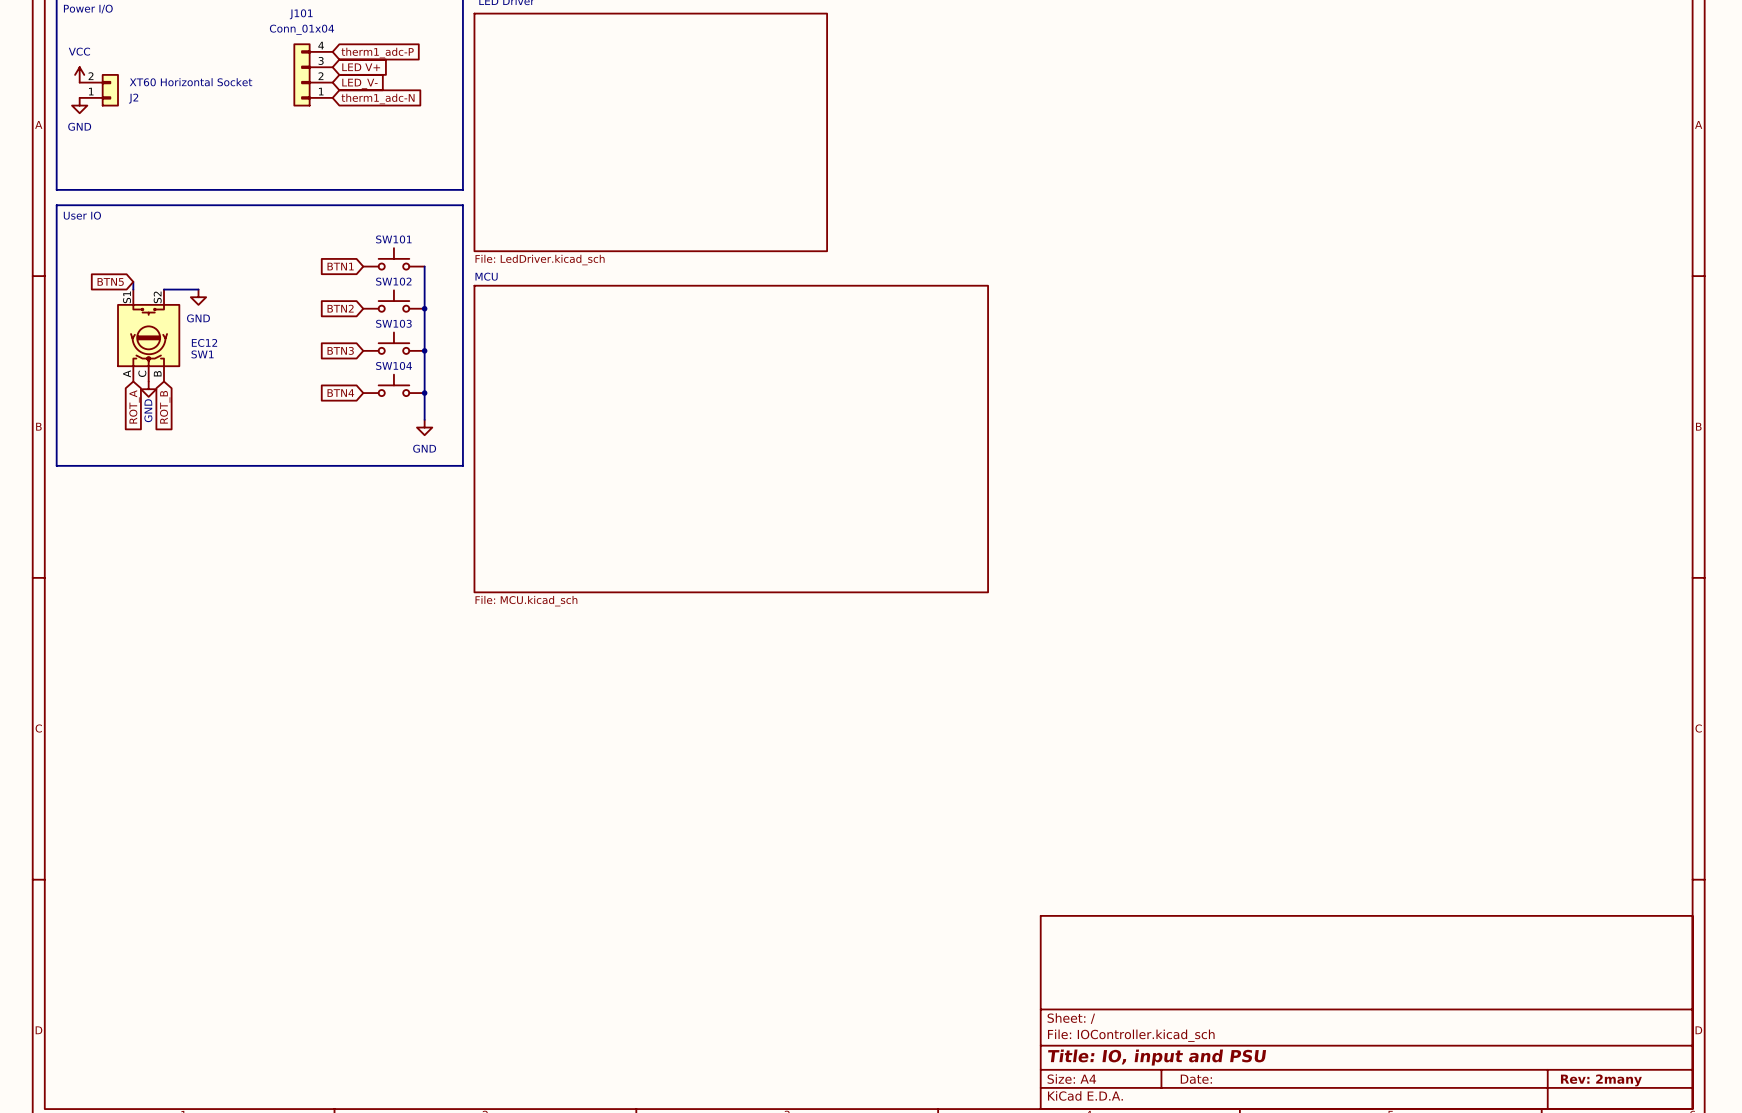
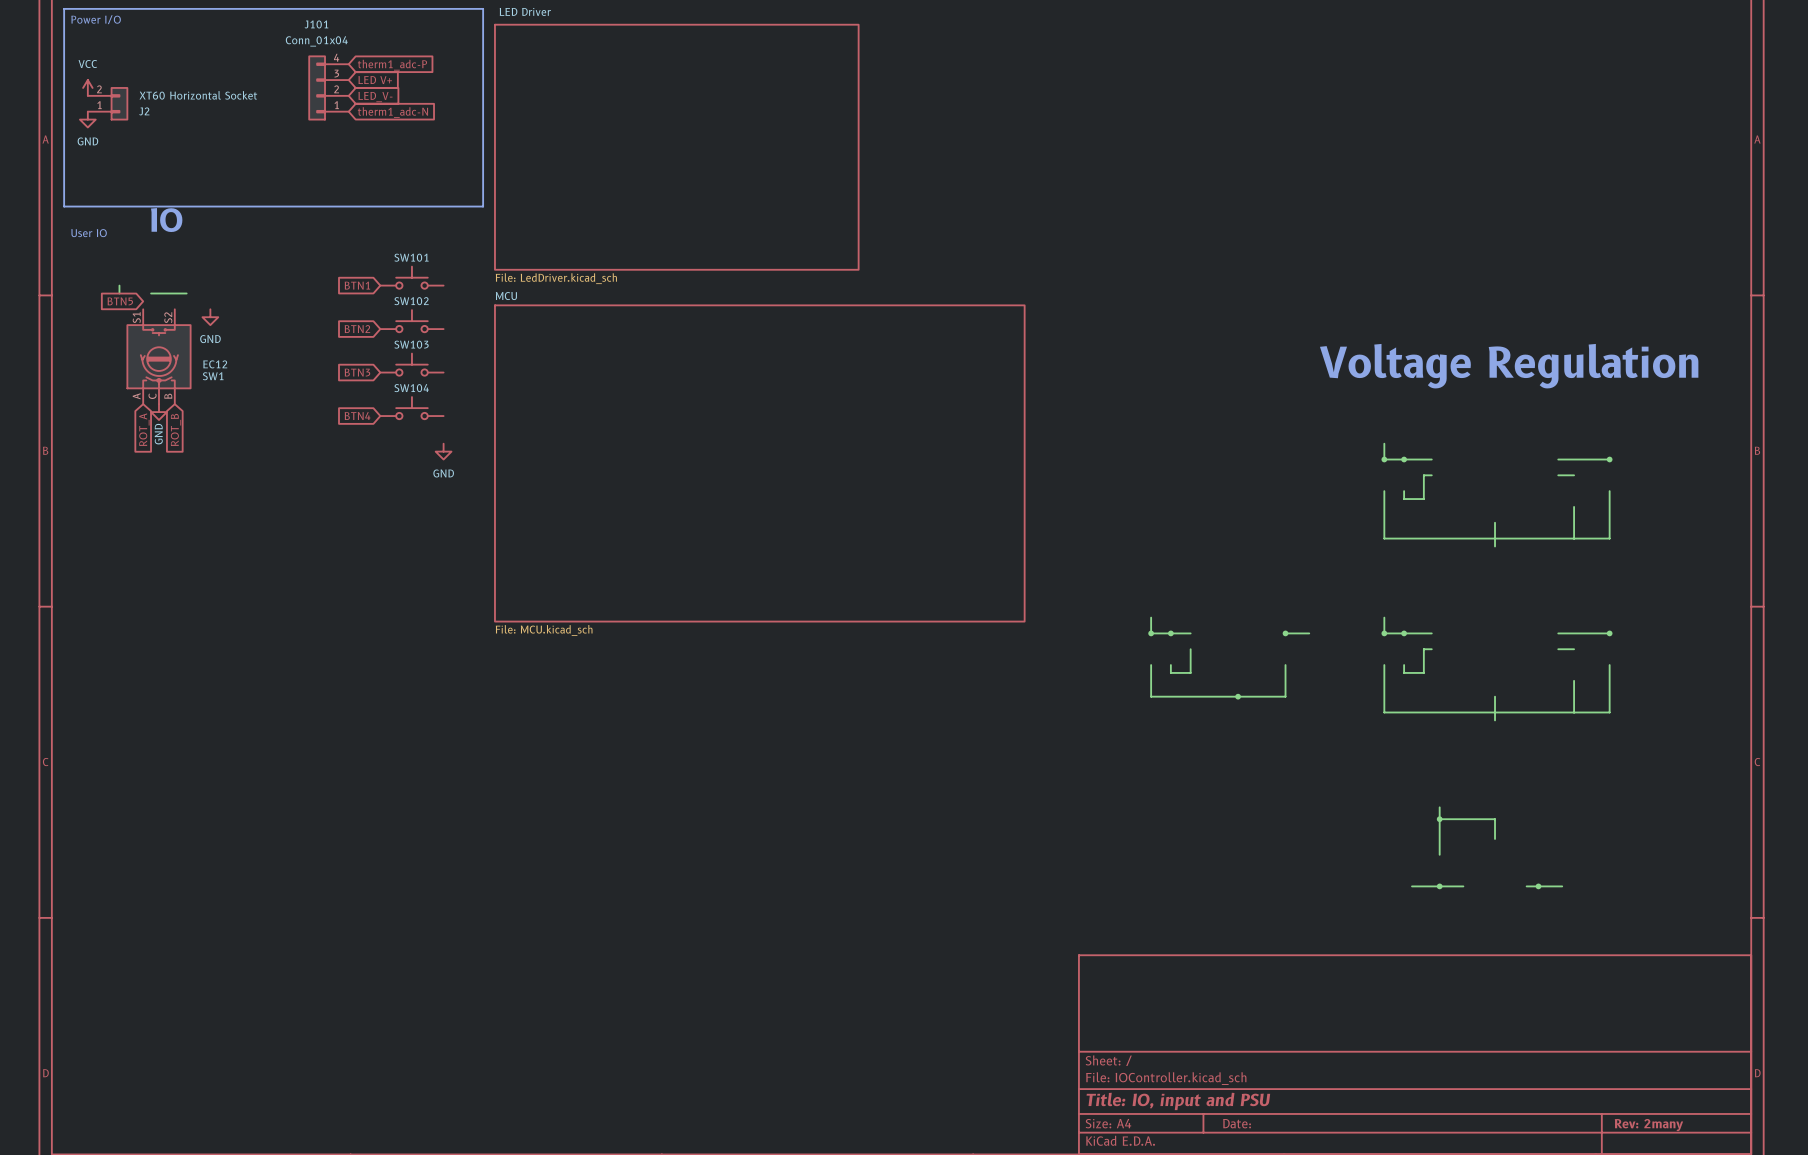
text: none -> IO (166, 220)
line: (56, 205) (56, 465) (462, 465) (462, 205) (56, 205) -> none
wire: (424, 266) (424, 419) -> none
wire: (133, 281) (133, 289) -> (119, 285) (119, 293)
wire: (164, 289) (198, 289) -> (151, 293) (186, 293)
junction: (424, 308) -> none
text: none -> Voltage Regulation (1509, 366)
junction: (424, 350) -> none
junction: (424, 393) -> none
wire: none -> (1384, 443) (1384, 459) (1431, 459)
junction: none -> (1384, 459)
junction: none -> (1404, 459)
wire: none -> (1558, 459) (1609, 459)
junction: none -> (1609, 459)
wire: none -> (1431, 475) (1423, 475) (1423, 499) (1404, 499) (1404, 491)
wire: none -> (1558, 475) (1574, 475)
wire: none -> (1384, 491) (1384, 538) (1609, 538) (1609, 491)
wire: none -> (1574, 506) (1574, 538)
wire: none -> (1495, 522) (1495, 546)
wire: none -> (1151, 617) (1151, 633) (1190, 633)
wire: none -> (1384, 617) (1384, 633) (1431, 633)
junction: none -> (1151, 633)
junction: none -> (1170, 633)
wire: none -> (1285, 633) (1309, 633)
junction: none -> (1285, 633)
junction: none -> (1384, 633)
junction: none -> (1404, 633)
wire: none -> (1558, 633) (1609, 633)
junction: none -> (1609, 633)
wire: none -> (1190, 649) (1190, 672) (1170, 672) (1170, 665)
wire: none -> (1431, 649) (1423, 649) (1423, 672) (1404, 672) (1404, 665)
wire: none -> (1558, 649) (1574, 649)
wire: none -> (1151, 665) (1151, 696) (1285, 696) (1285, 665)
wire: none -> (1384, 665) (1384, 712) (1609, 712) (1609, 665)
wire: none -> (1574, 680) (1574, 712)
junction: none -> (1238, 696)
wire: none -> (1495, 696) (1495, 720)
wire: none -> (1439, 807) (1439, 854)
wire: none -> (1439, 819) (1495, 819) (1495, 838)
junction: none -> (1439, 819)
wire: none -> (1412, 886) (1463, 886)
junction: none -> (1439, 886)
wire: none -> (1526, 886) (1562, 886)
junction: none -> (1538, 886)

